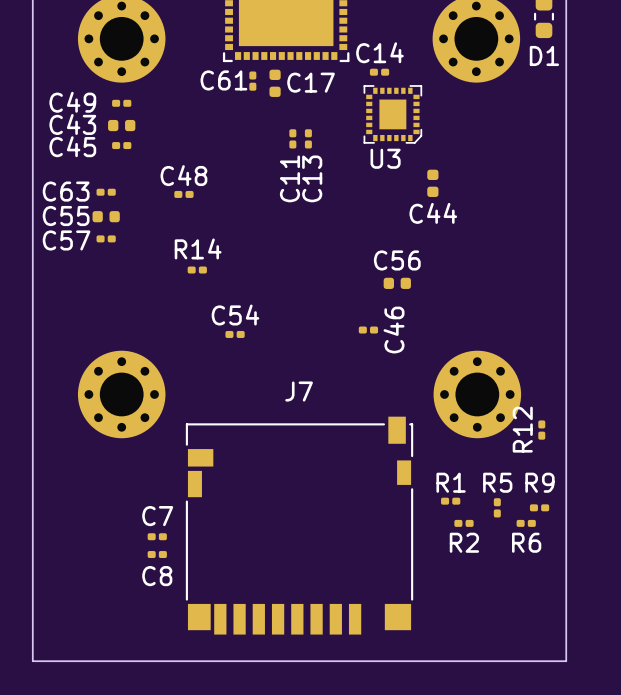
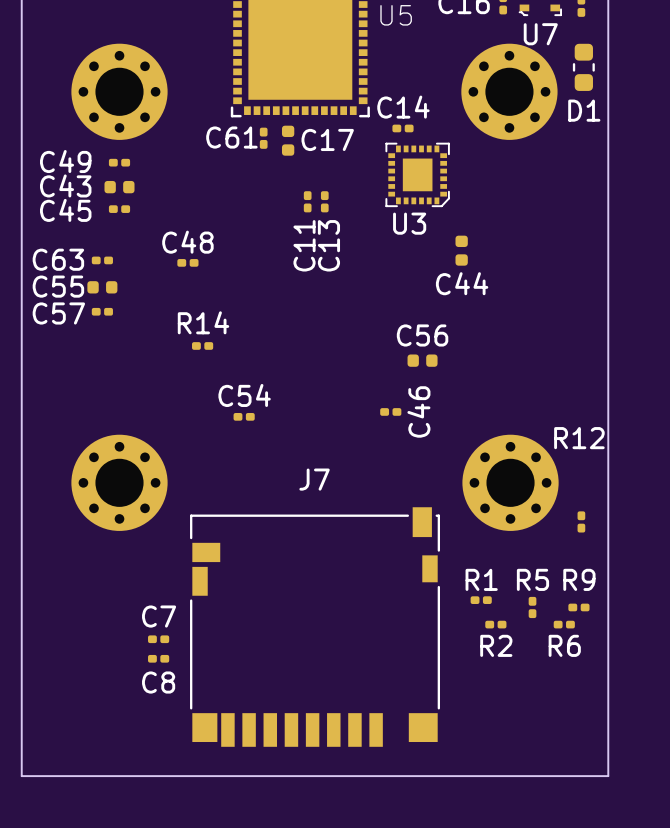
R12 name rotation: 0° (522, 429) -> 90° clockwise (579, 438)
R12 name position: R12 (522, 429) -> R12 (579, 438)

